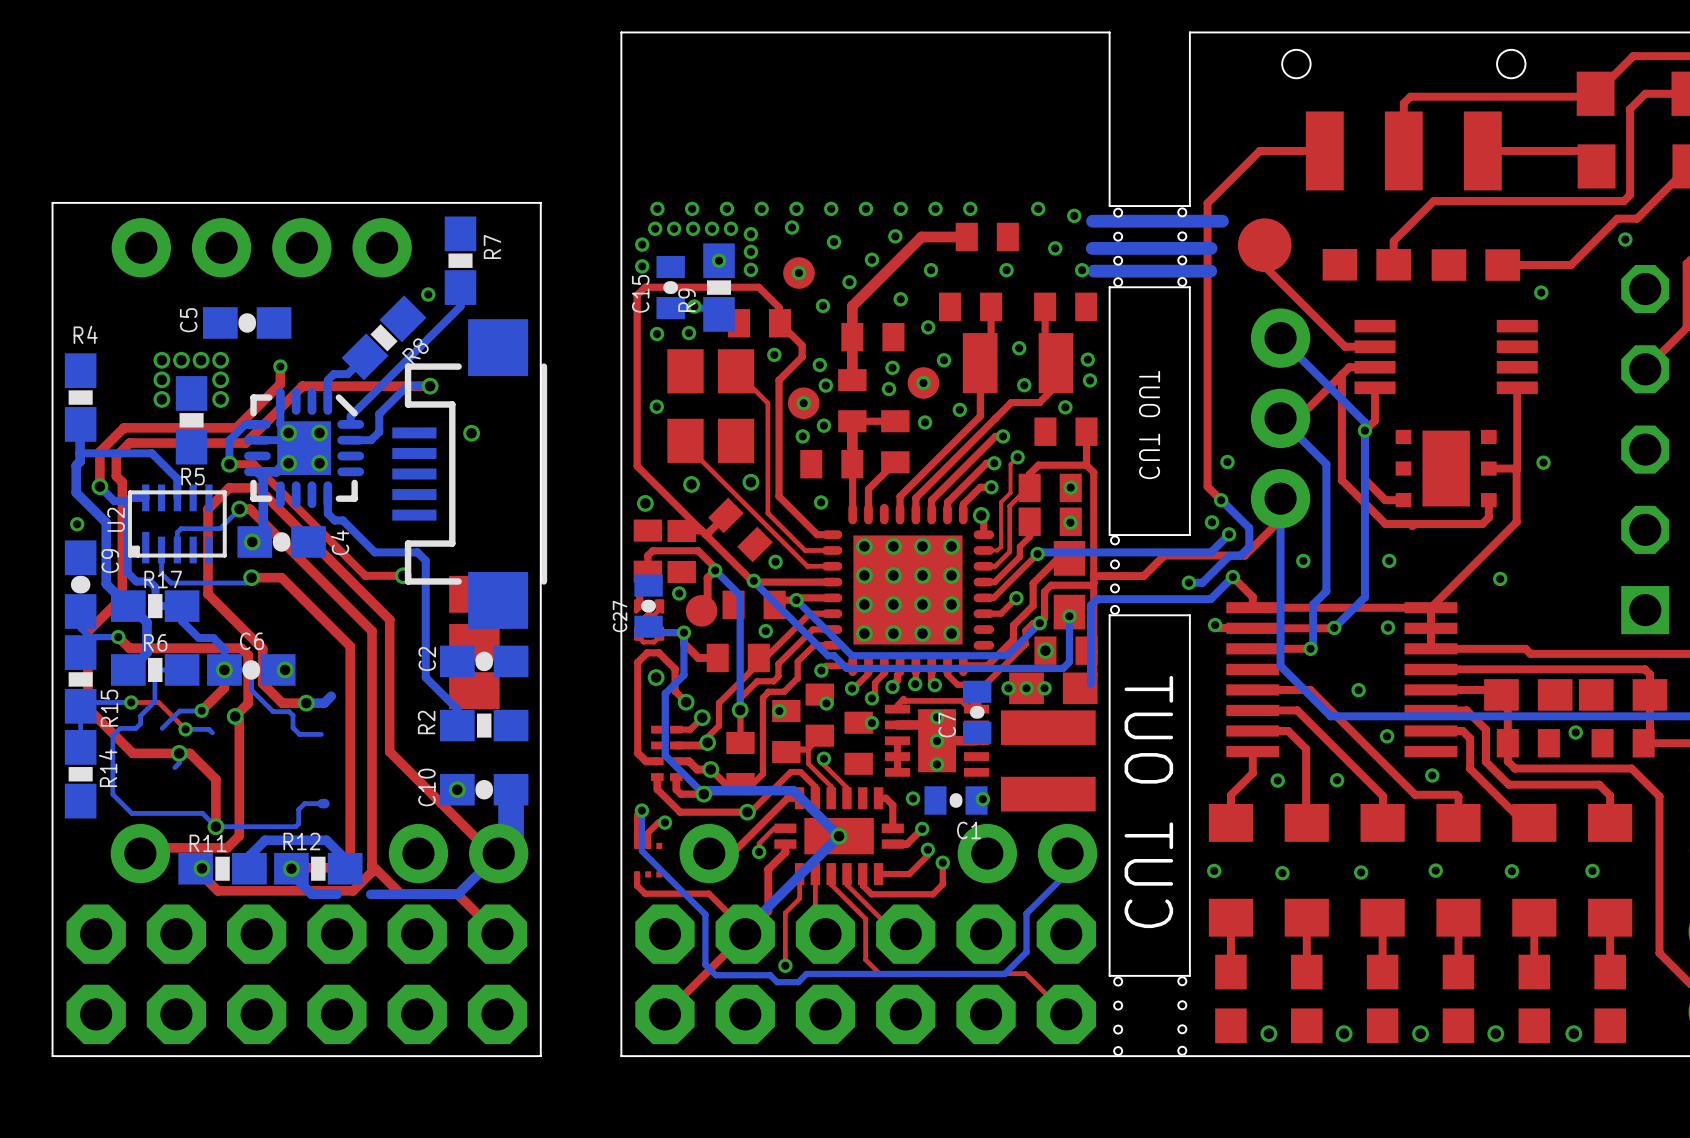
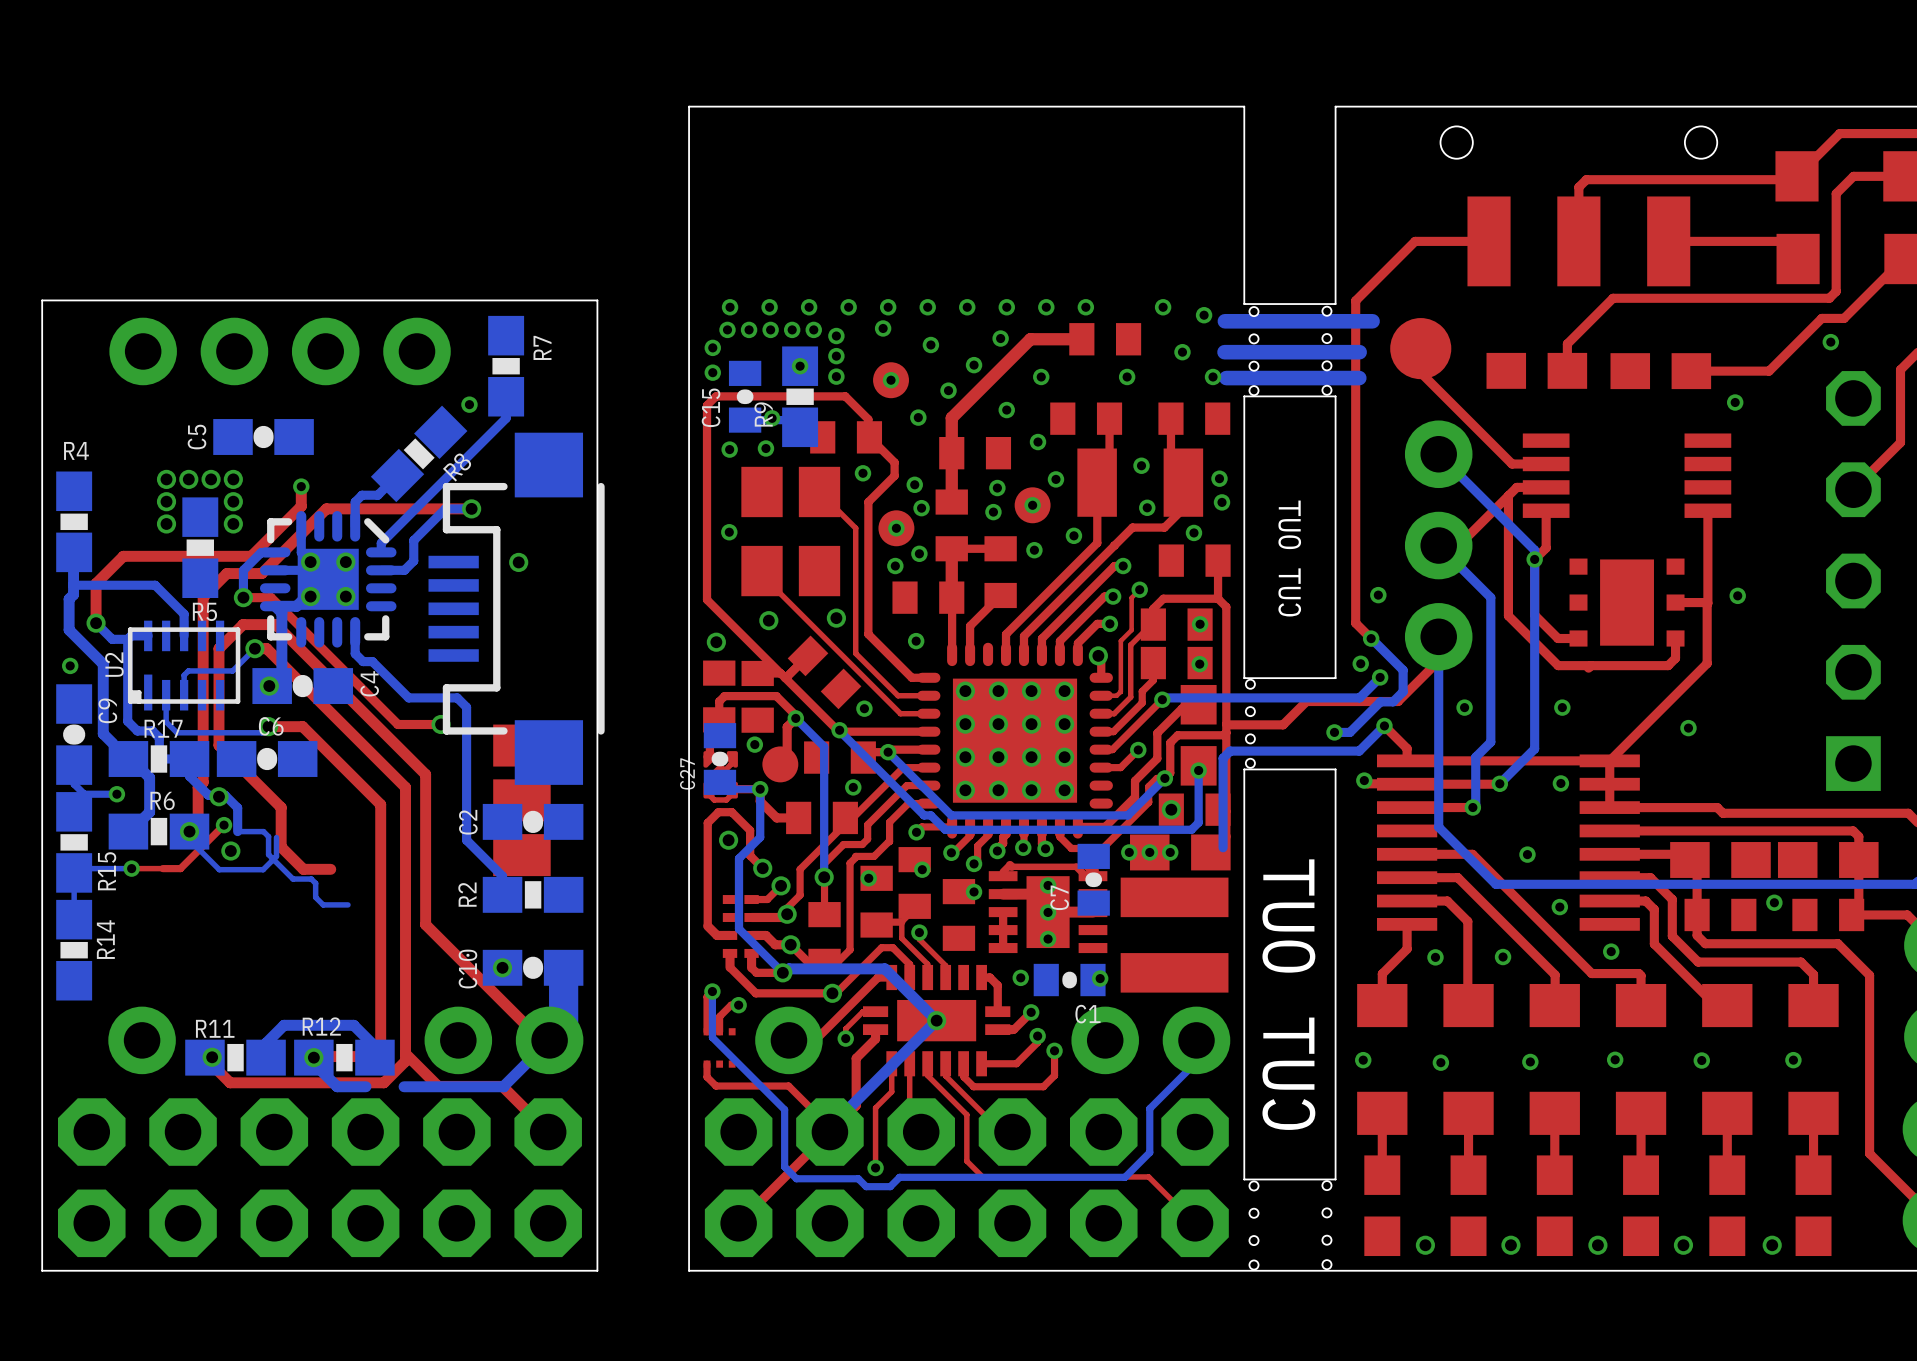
top track: (214, 443) (129, 443) (116, 456) (116, 476) (122, 482) (122, 597) (87, 631) (87, 708) (132, 753) (190, 753) (215, 779) (215, 826) -> (226, 573) (203, 597) (203, 782) (198, 787) (198, 822) (189, 831)
top track: (118, 637) (129, 648) (241, 648) (248, 655) (248, 703) (235, 716) (239, 720) (239, 835) (227, 847) (146, 847) (140, 853) -> none
via: none -> (218, 796)
bottom track: (174, 669) (158, 669) (154, 673) (154, 701) (140, 715) (140, 723) (135, 728) (120, 728) (112, 735) (112, 794) (131, 813) (202, 813) (215, 826) -> none
bottom track: none -> (189, 831) (189, 839) (219, 869) (263, 869) (276, 856) (276, 837)
via: none -> (189, 831)
top track: (224, 669) (224, 687) (201, 710) -> none
via position: (224, 669) -> (224, 825)
C6 position: (251, 669) -> (267, 759)
via: (285, 669) -> none
via: none -> (230, 851)
bottom track: (331, 696) (324, 703) (306, 703) -> none
top track: (158, 702) (185, 729) -> (162, 868) (180, 868) (224, 825)
via: (306, 703) -> none
via: (201, 710) -> none
bottom track: (201, 711) (179, 711) (162, 728) -> none
via: (235, 716) -> none
bottom track: (185, 729) (208, 729) (212, 732) -> none
via: (185, 729) -> none
bottom track: (179, 753) (179, 763) (174, 767) -> none
via: (179, 753) -> none
bottom track: (324, 803) (304, 803) (298, 809) (298, 823) (295, 826) (216, 826) -> none
via: (215, 826) -> none

